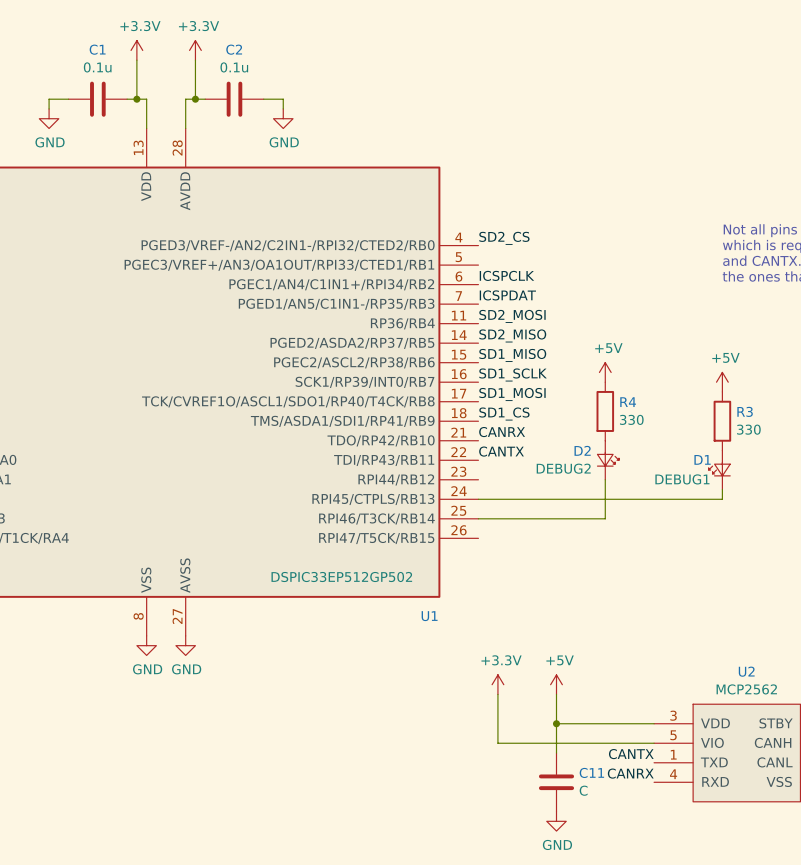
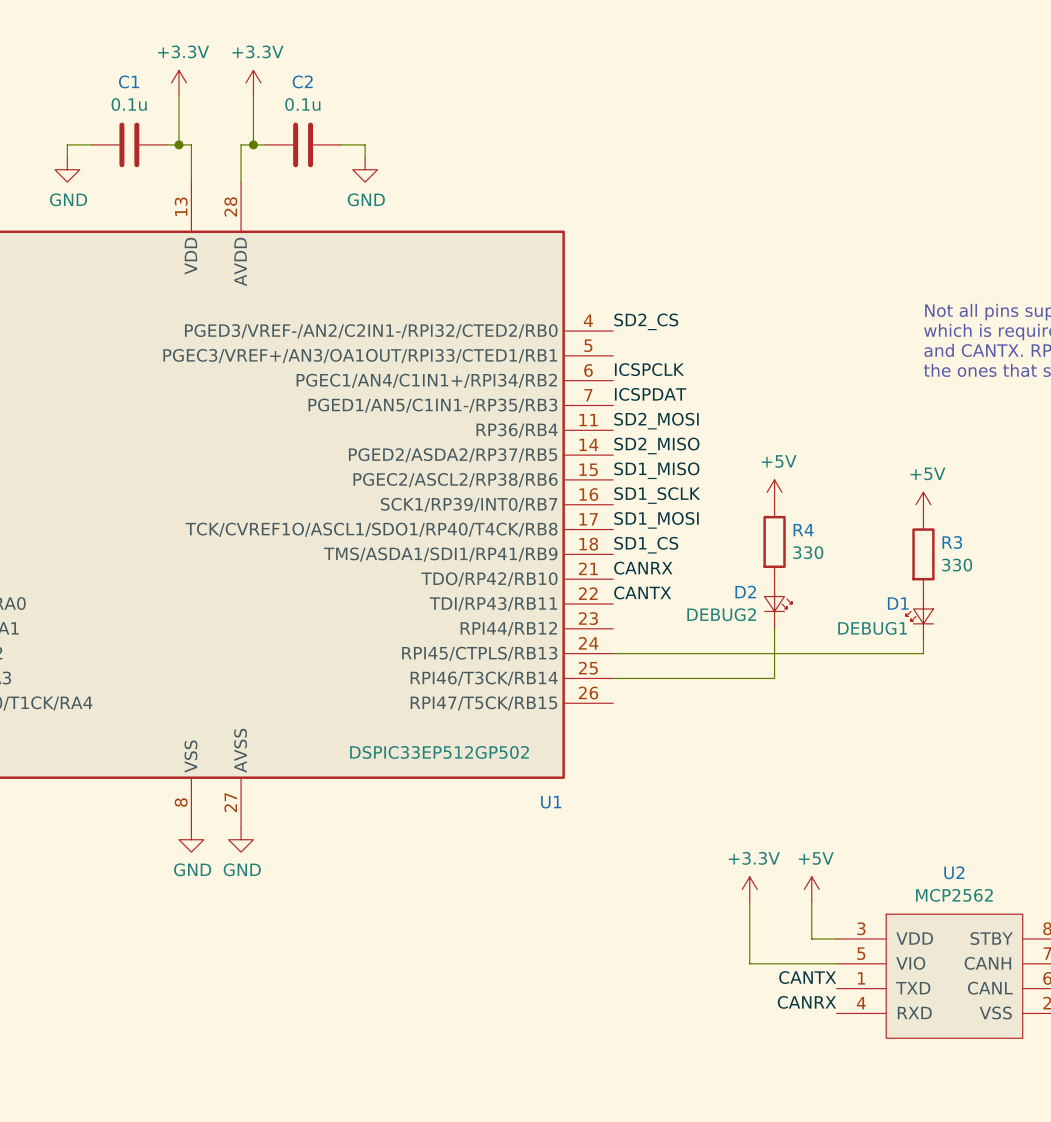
power symbol position: +3.3V (497, 684) -> +3.3V (749, 889)
power symbol position: +5V (556, 684) -> +5V (811, 889)
wire: (497, 694) (497, 743) (585, 743) -> (749, 901) (749, 963)
wire: (556, 694) (556, 753) -> none
wire: (556, 723) (634, 723) -> (811, 901) (811, 939)
junction: (556, 723) -> none
C11: C (556, 782) -> none
power symbol: GND (556, 821) -> none

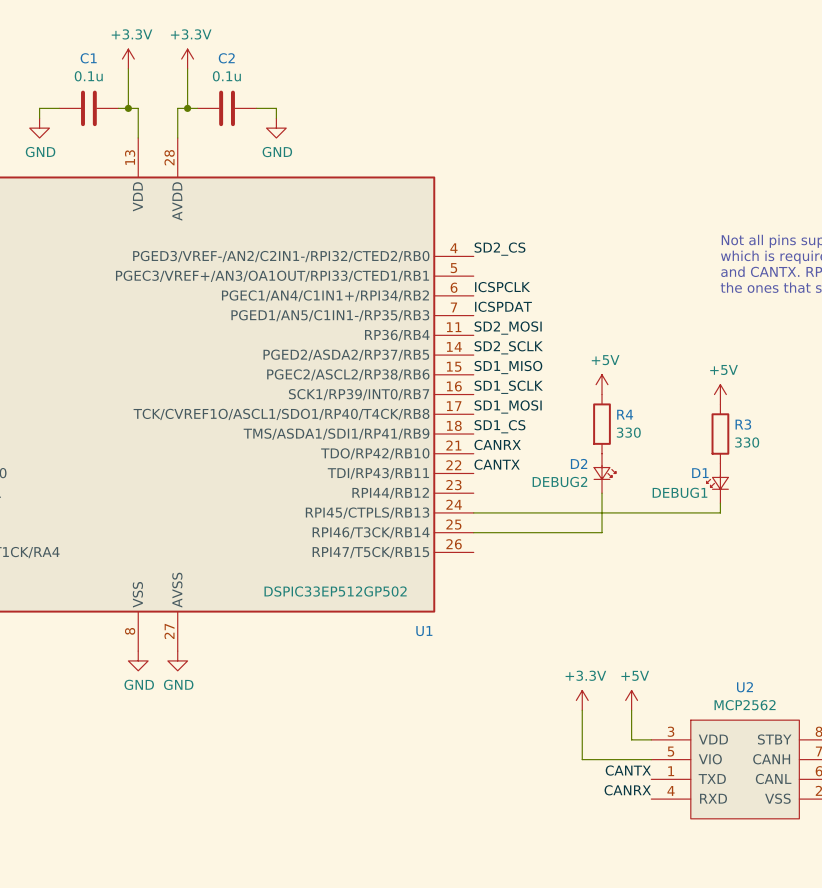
label: SD2_MISO (656, 445) -> SD2_SCLK (508, 347)

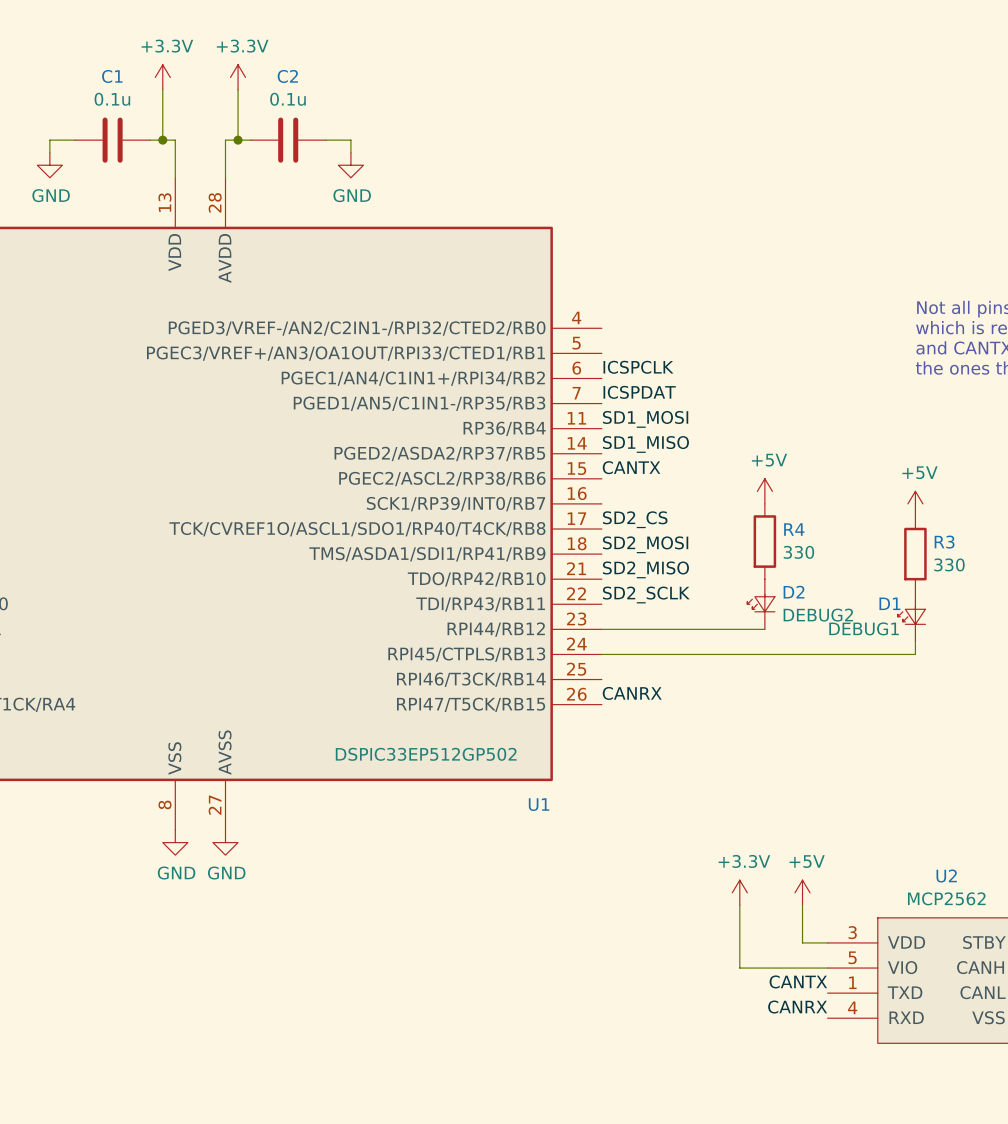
label: SD2_CS (500, 249) -> none
label: SD2_MOSI (508, 328) -> SD1_MOSI (645, 419)
label: SD2_SCLK (508, 347) -> SD1_MISO (645, 444)
label: SD1_MISO (508, 367) -> CANTX (631, 467)
label: SD1_SCLK (508, 387) -> none
label: SD1_MOSI (508, 406) -> SD2_CS (635, 519)
label: SD1_CS (500, 426) -> SD2_MOSI (645, 544)
label: CANRX (497, 444) -> SD2_MISO (645, 569)
label: CANTX (497, 464) -> SD2_SCLK (646, 594)
D2 flip: as is (604, 472) -> left-right (761, 603)
wire: (602, 493) (602, 532) (473, 532) -> (764, 629) (601, 629)
label: none -> CANRX (632, 693)

